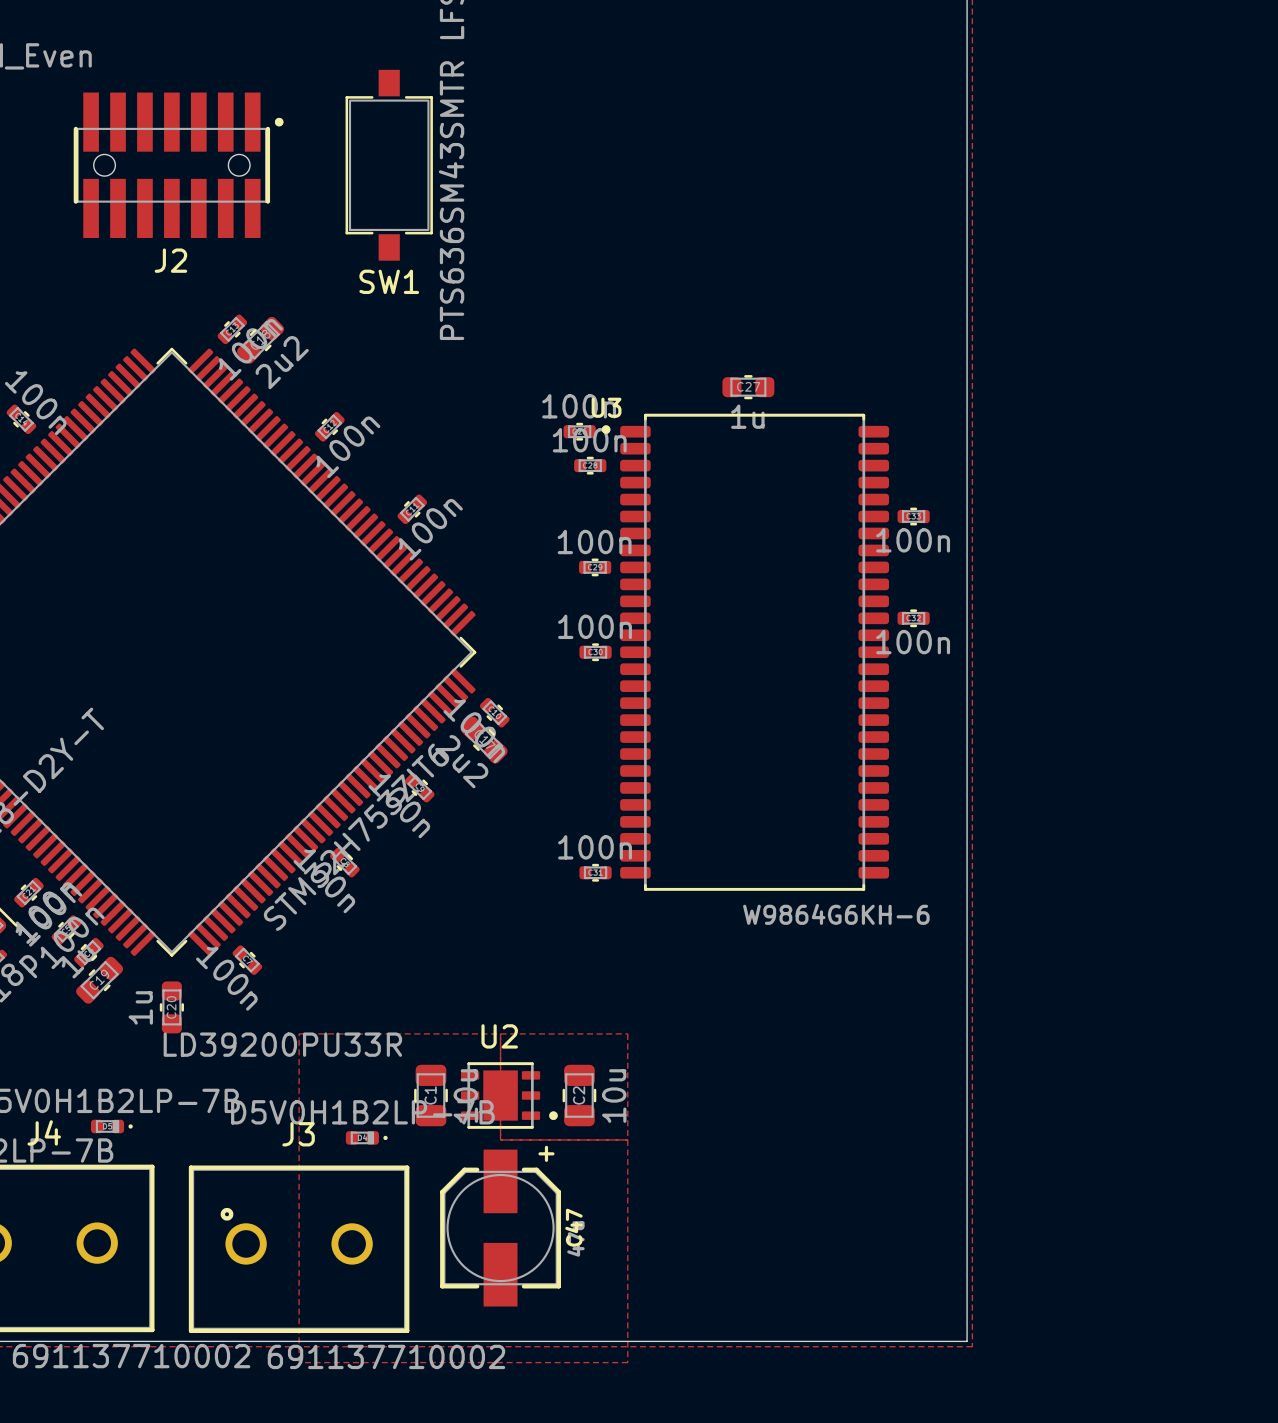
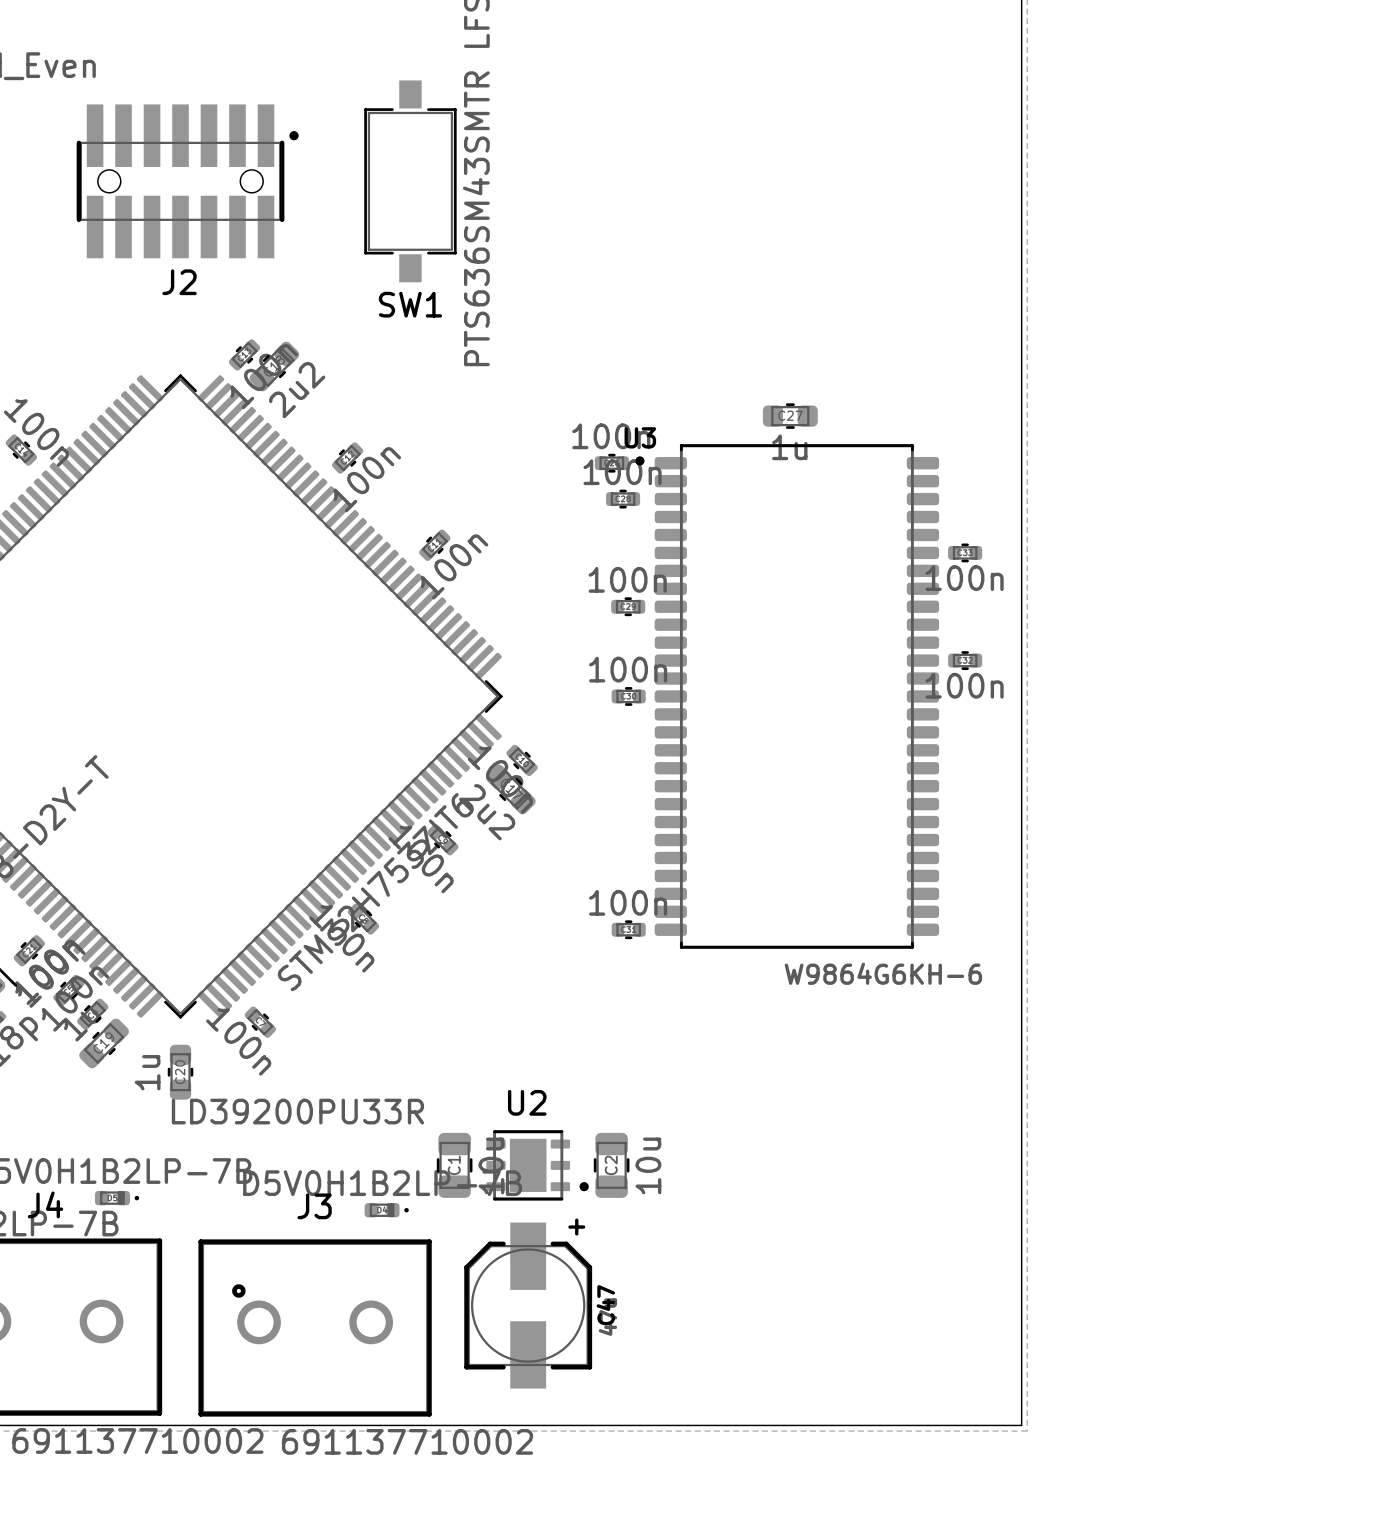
zone outline: (299, 1033) (299, 1362) (627, 1362) (627, 1033) (299, 1033) -> none
zone outline: (500, 1033) (500, 1139) (627, 1139) -> none

